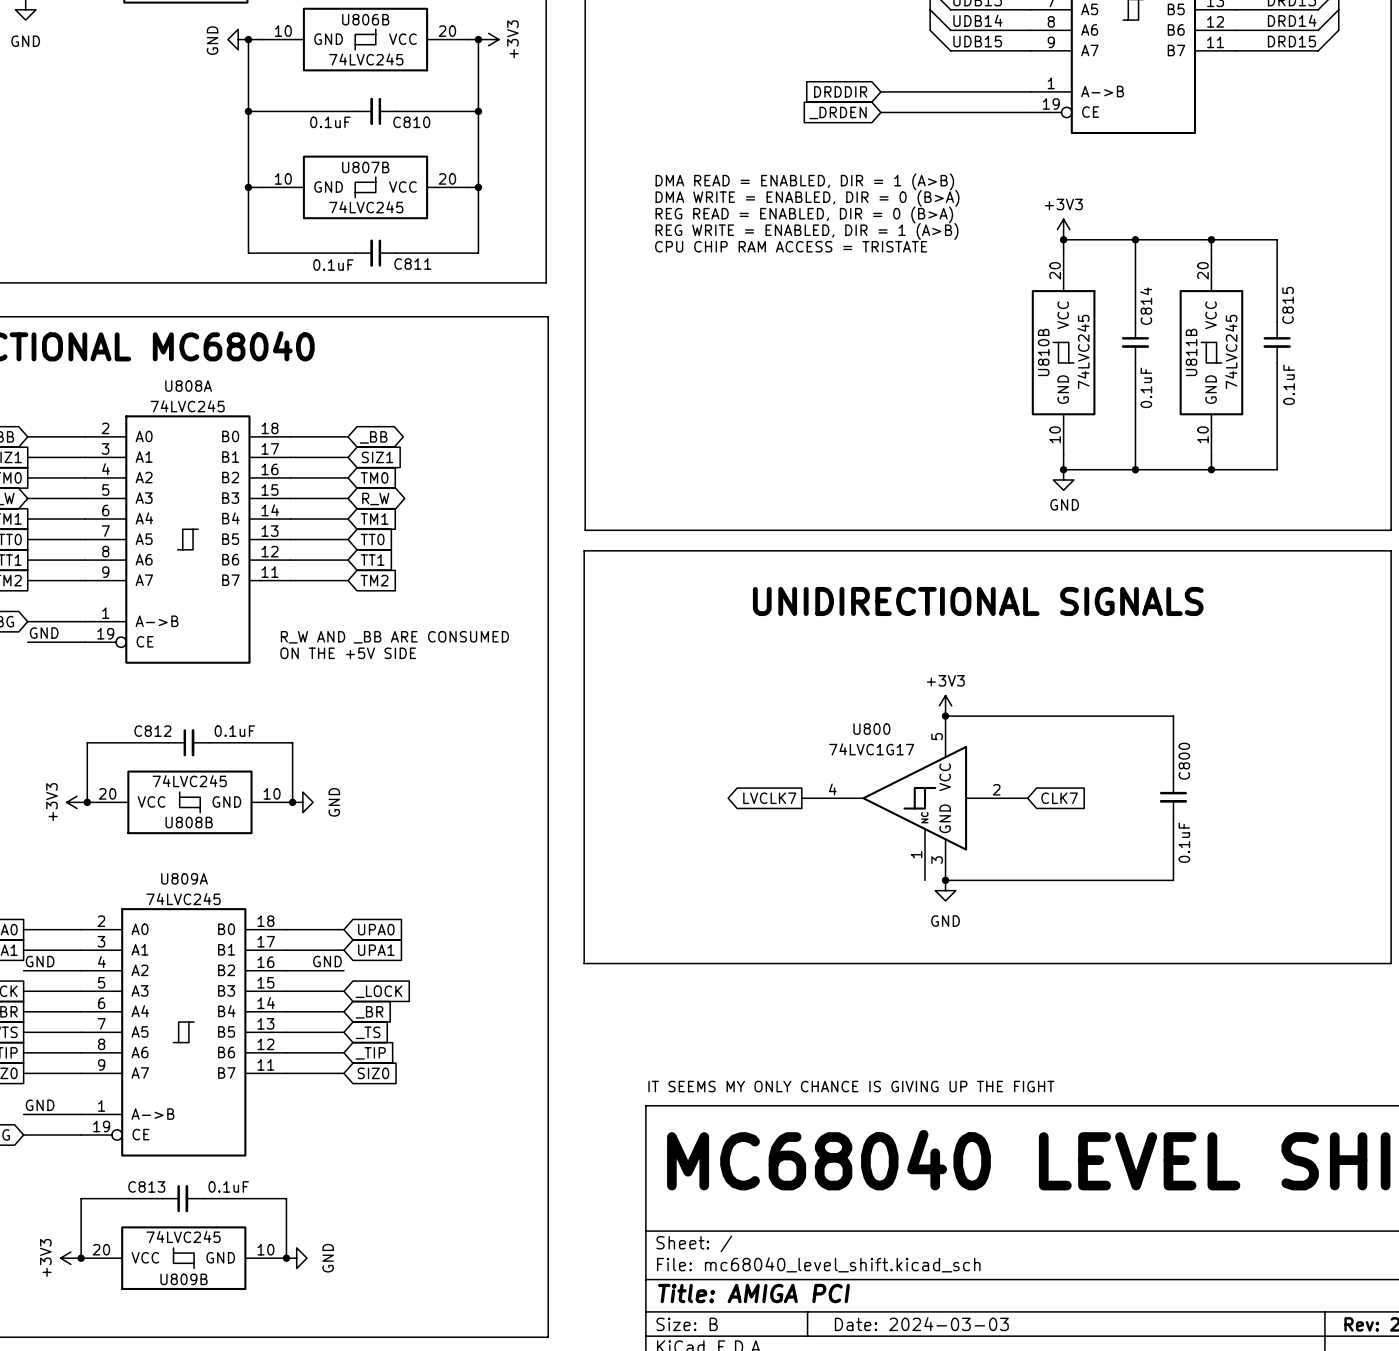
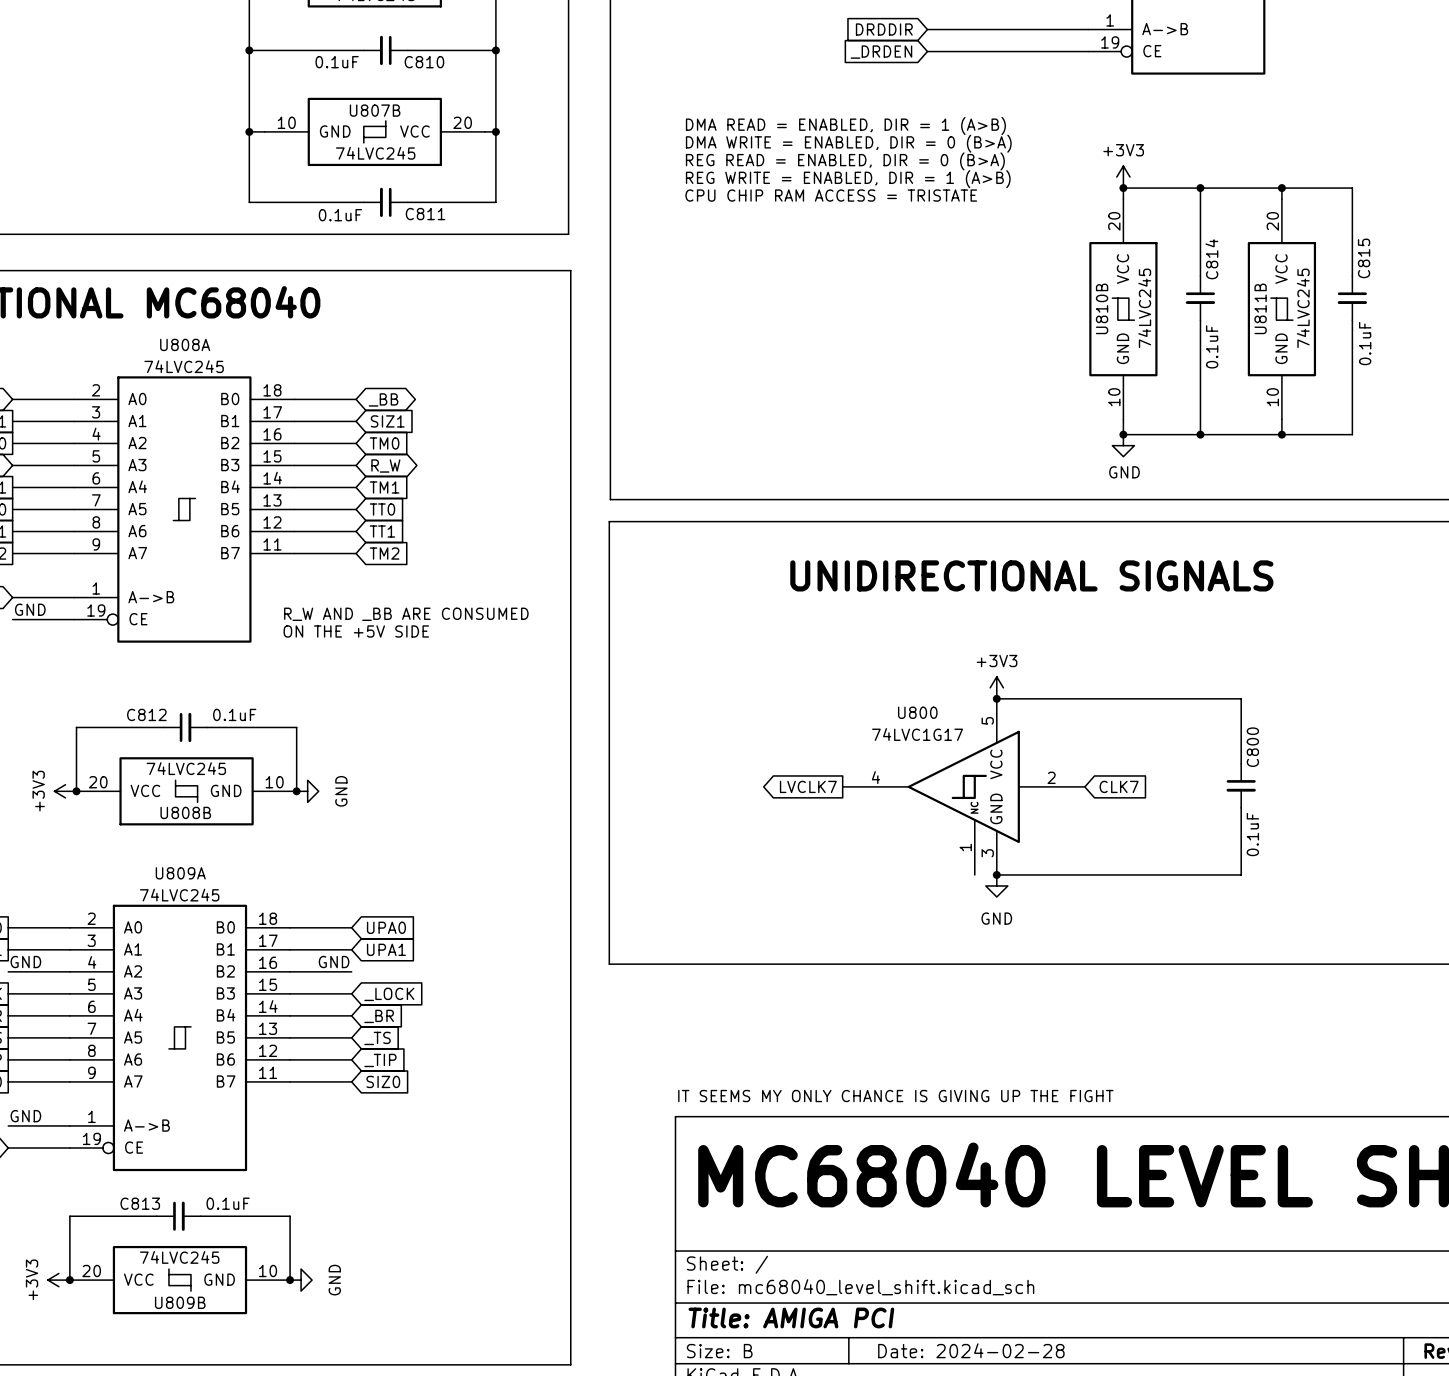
title block: Date: 2024-03-03 (921, 1324) -> Date: 2024-02-28 (971, 1350)

